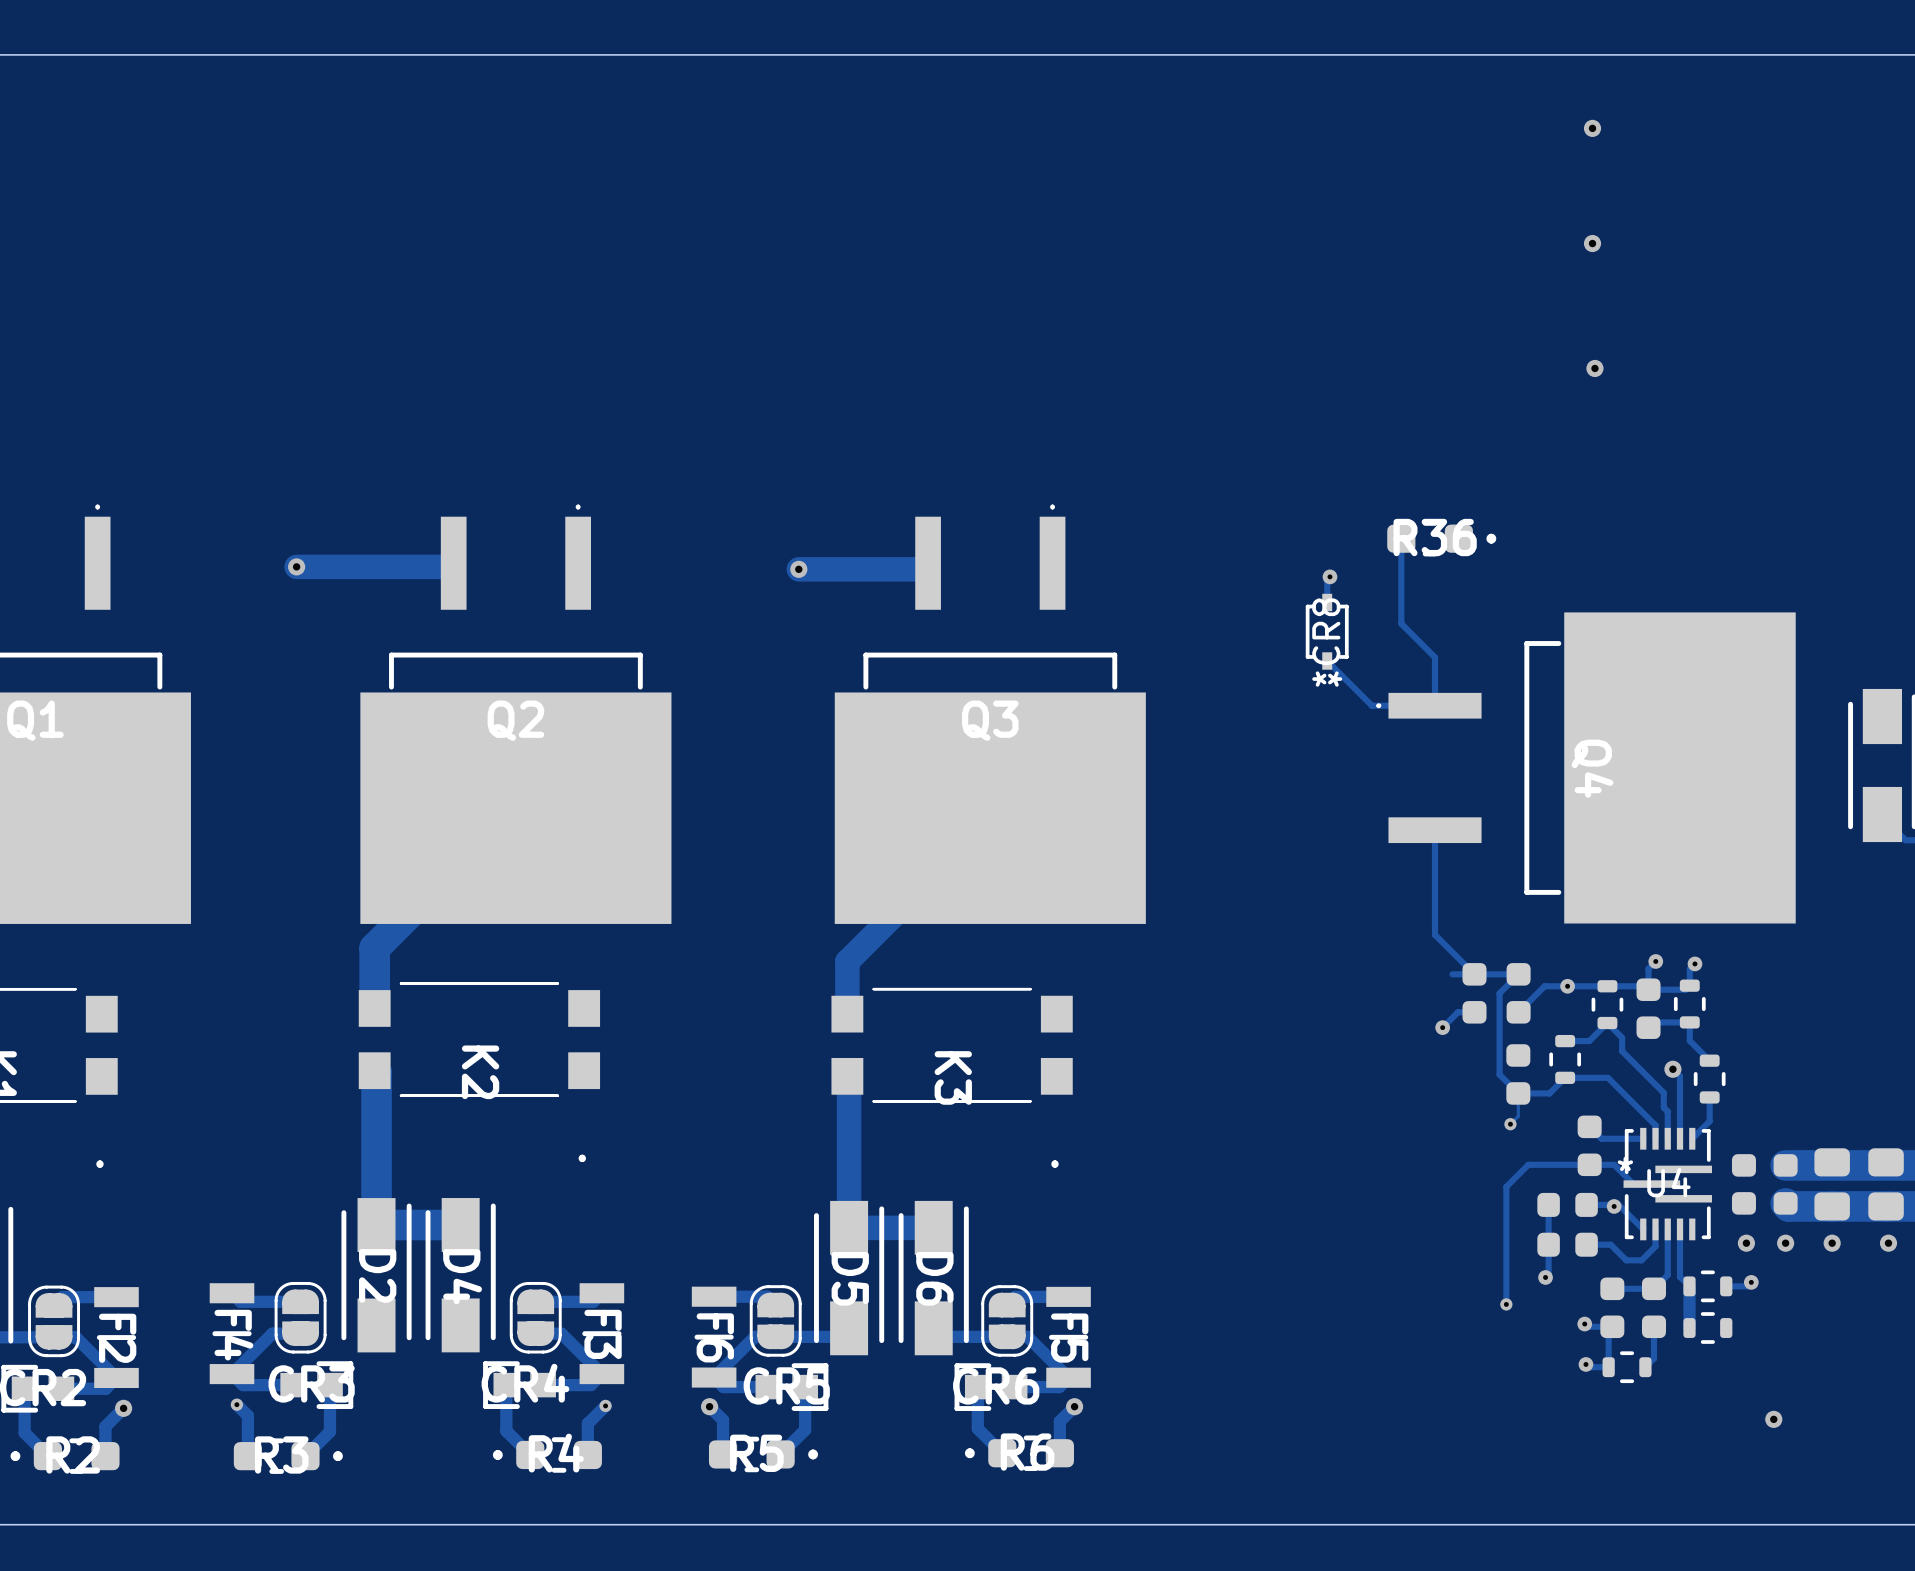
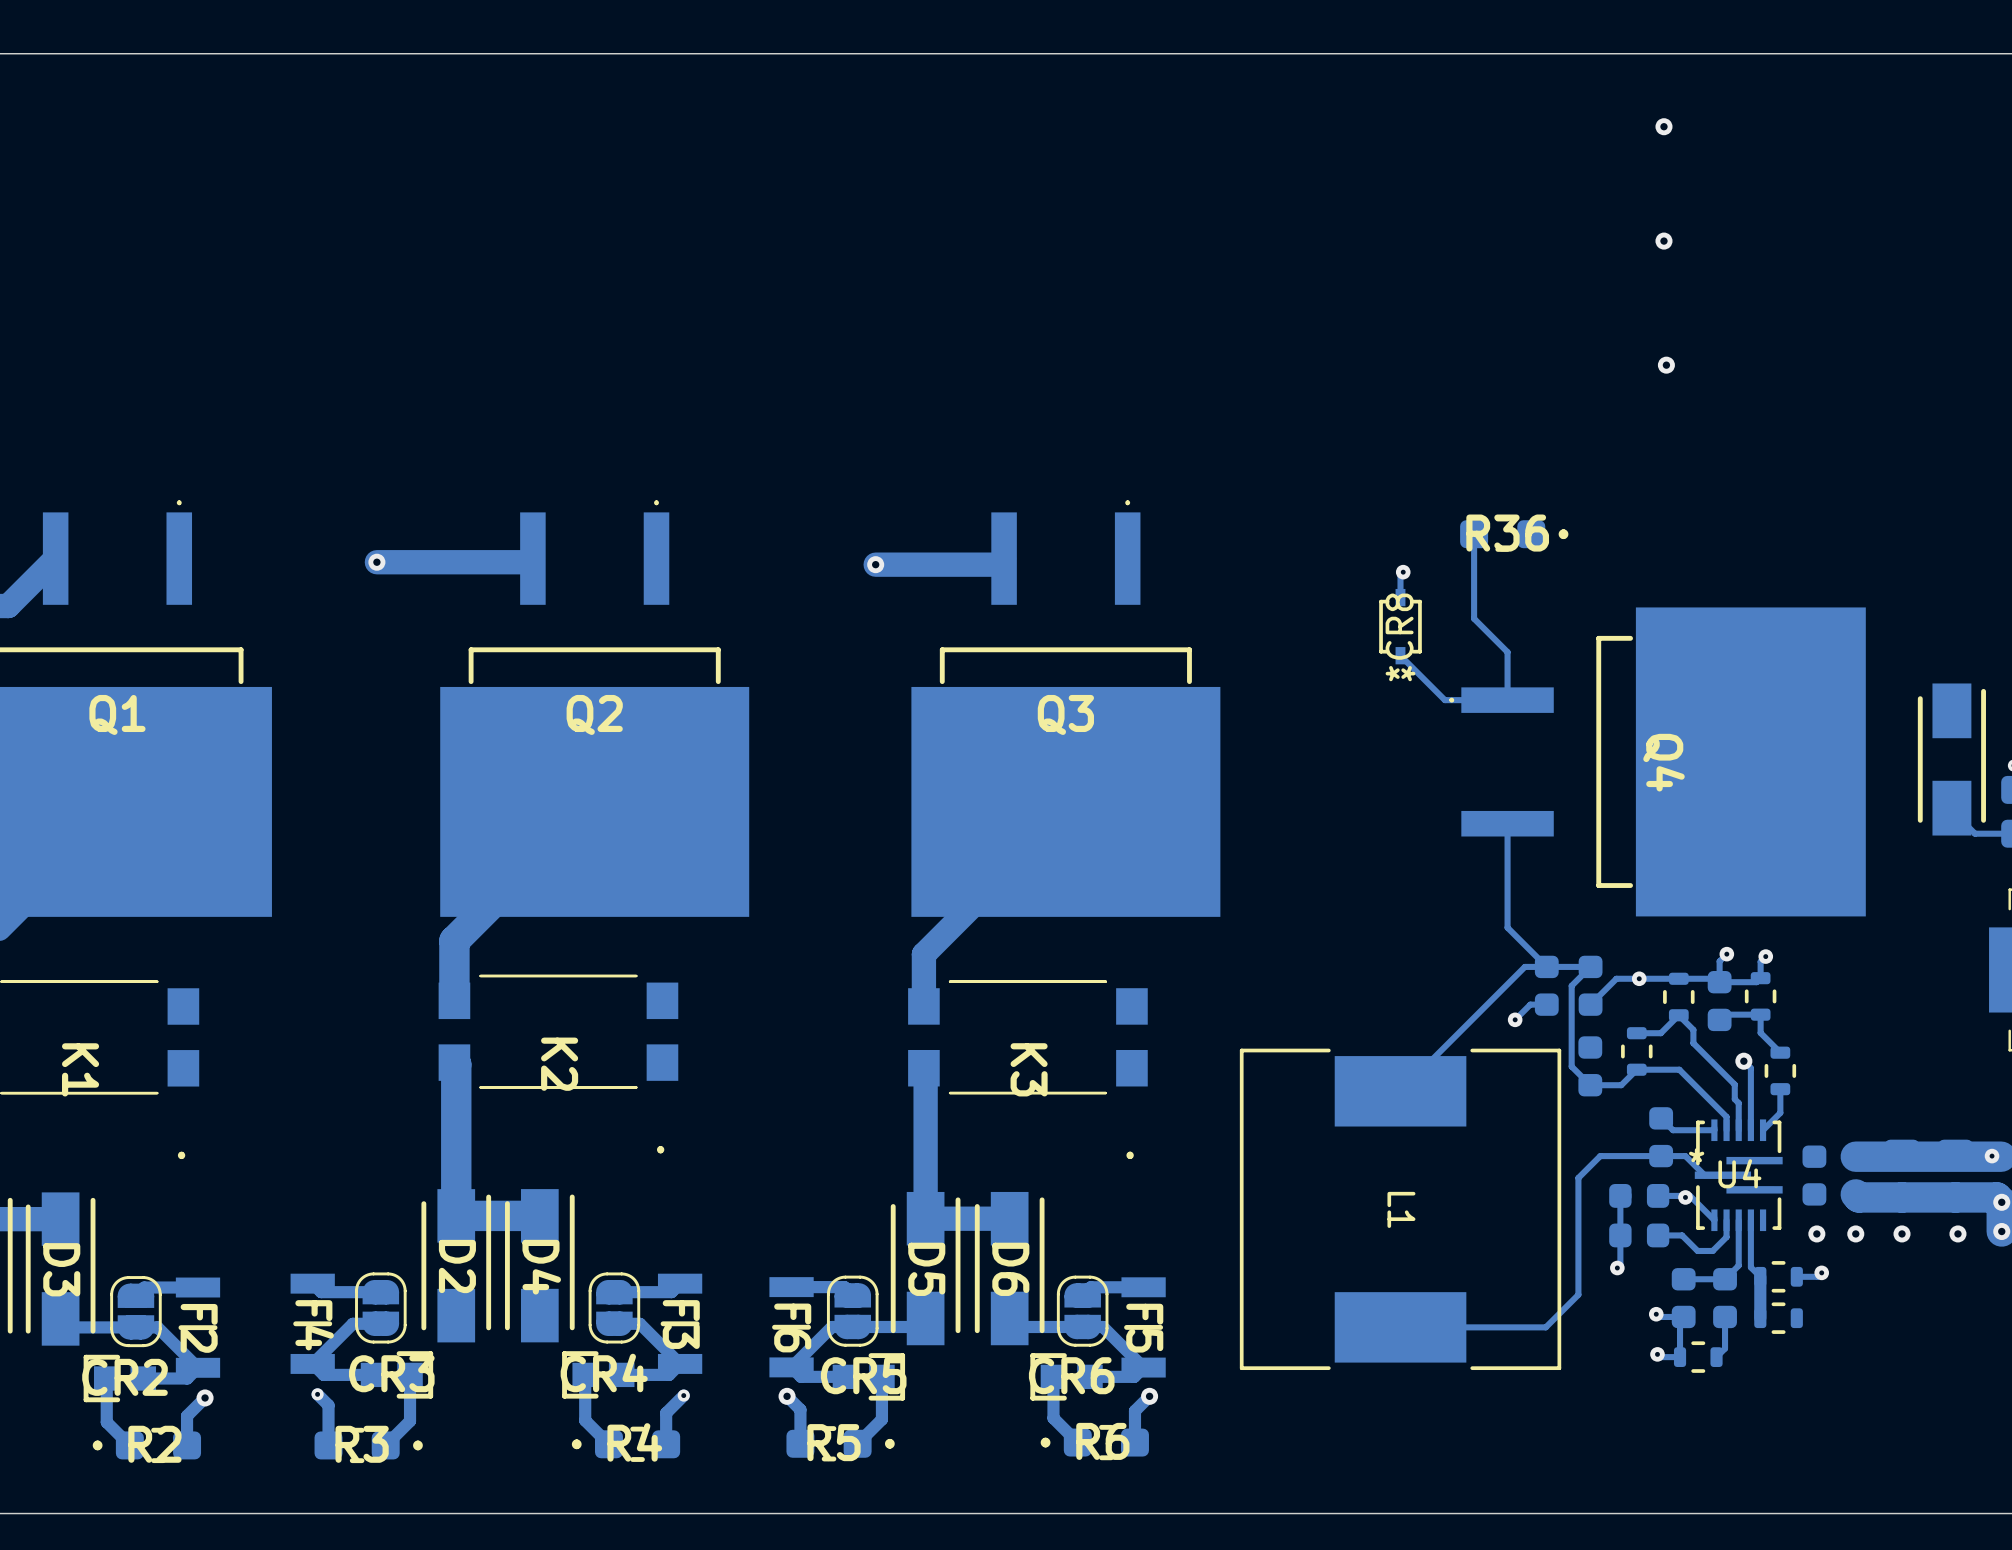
track: none -> (1524, 966) (1400, 1091)
track: (1518, 1093) (1518, 1116) (1510, 1124) -> none
via: (1510, 1124) -> none
L1: none -> (1400, 1209)
track: none -> (1578, 1294) (1545, 1327) (1400, 1327)
via: (1506, 1304) -> none
via: (1773, 1419) -> none

